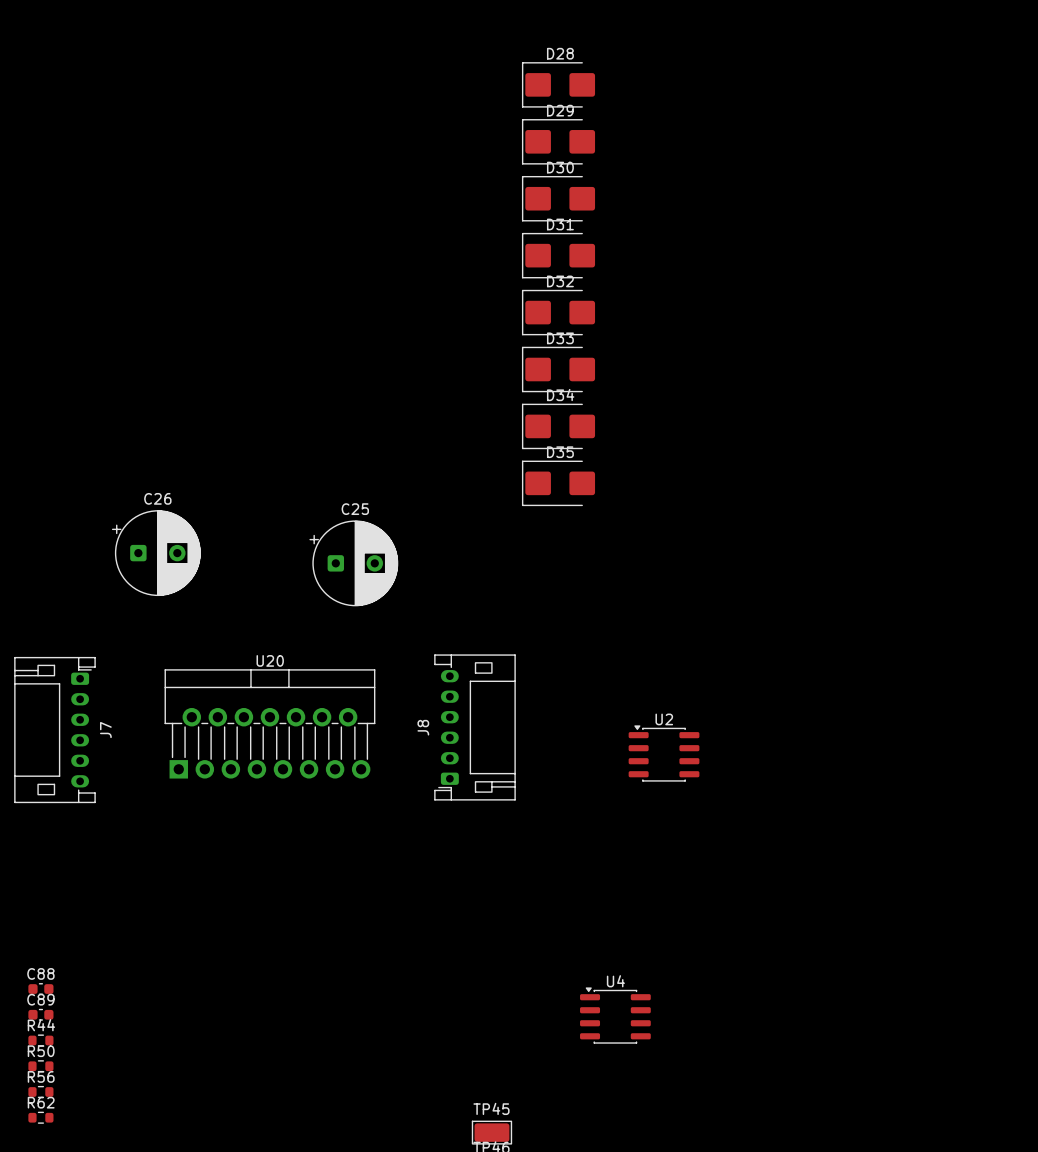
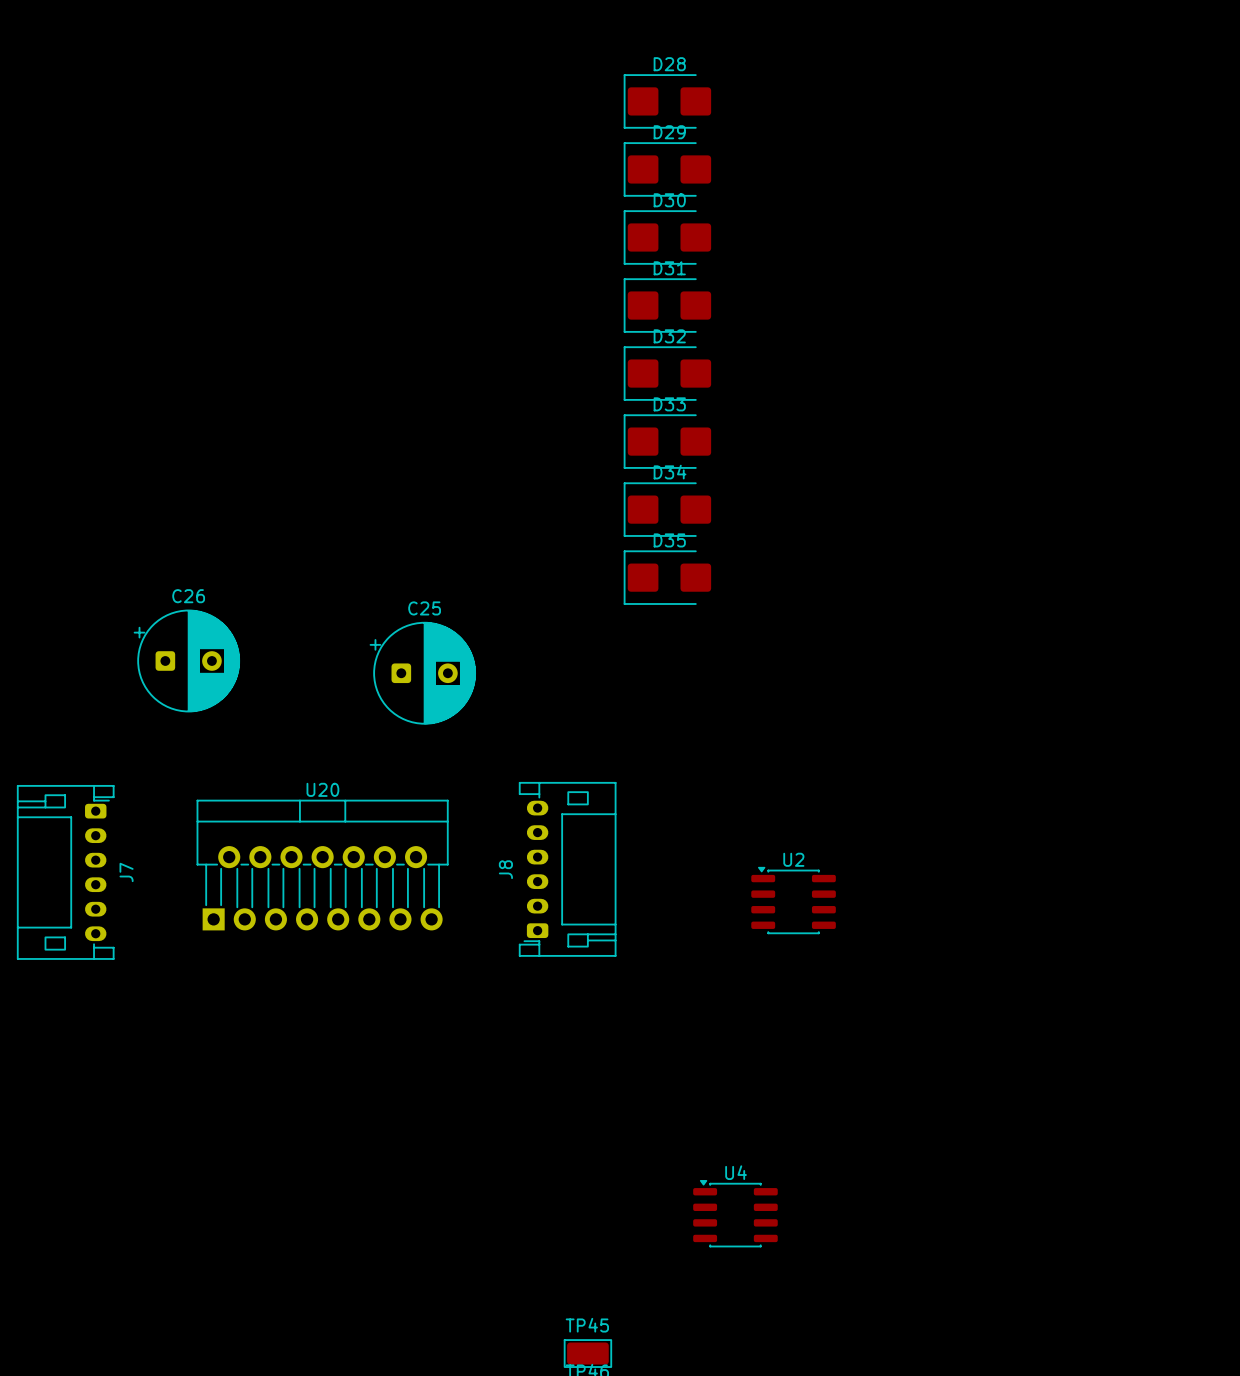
C88: (40, 989) -> none
C89: (40, 1014) -> none
R44: (40, 1040) -> none
R50: (40, 1066) -> none
R56: (40, 1091) -> none
R62: (40, 1117) -> none

